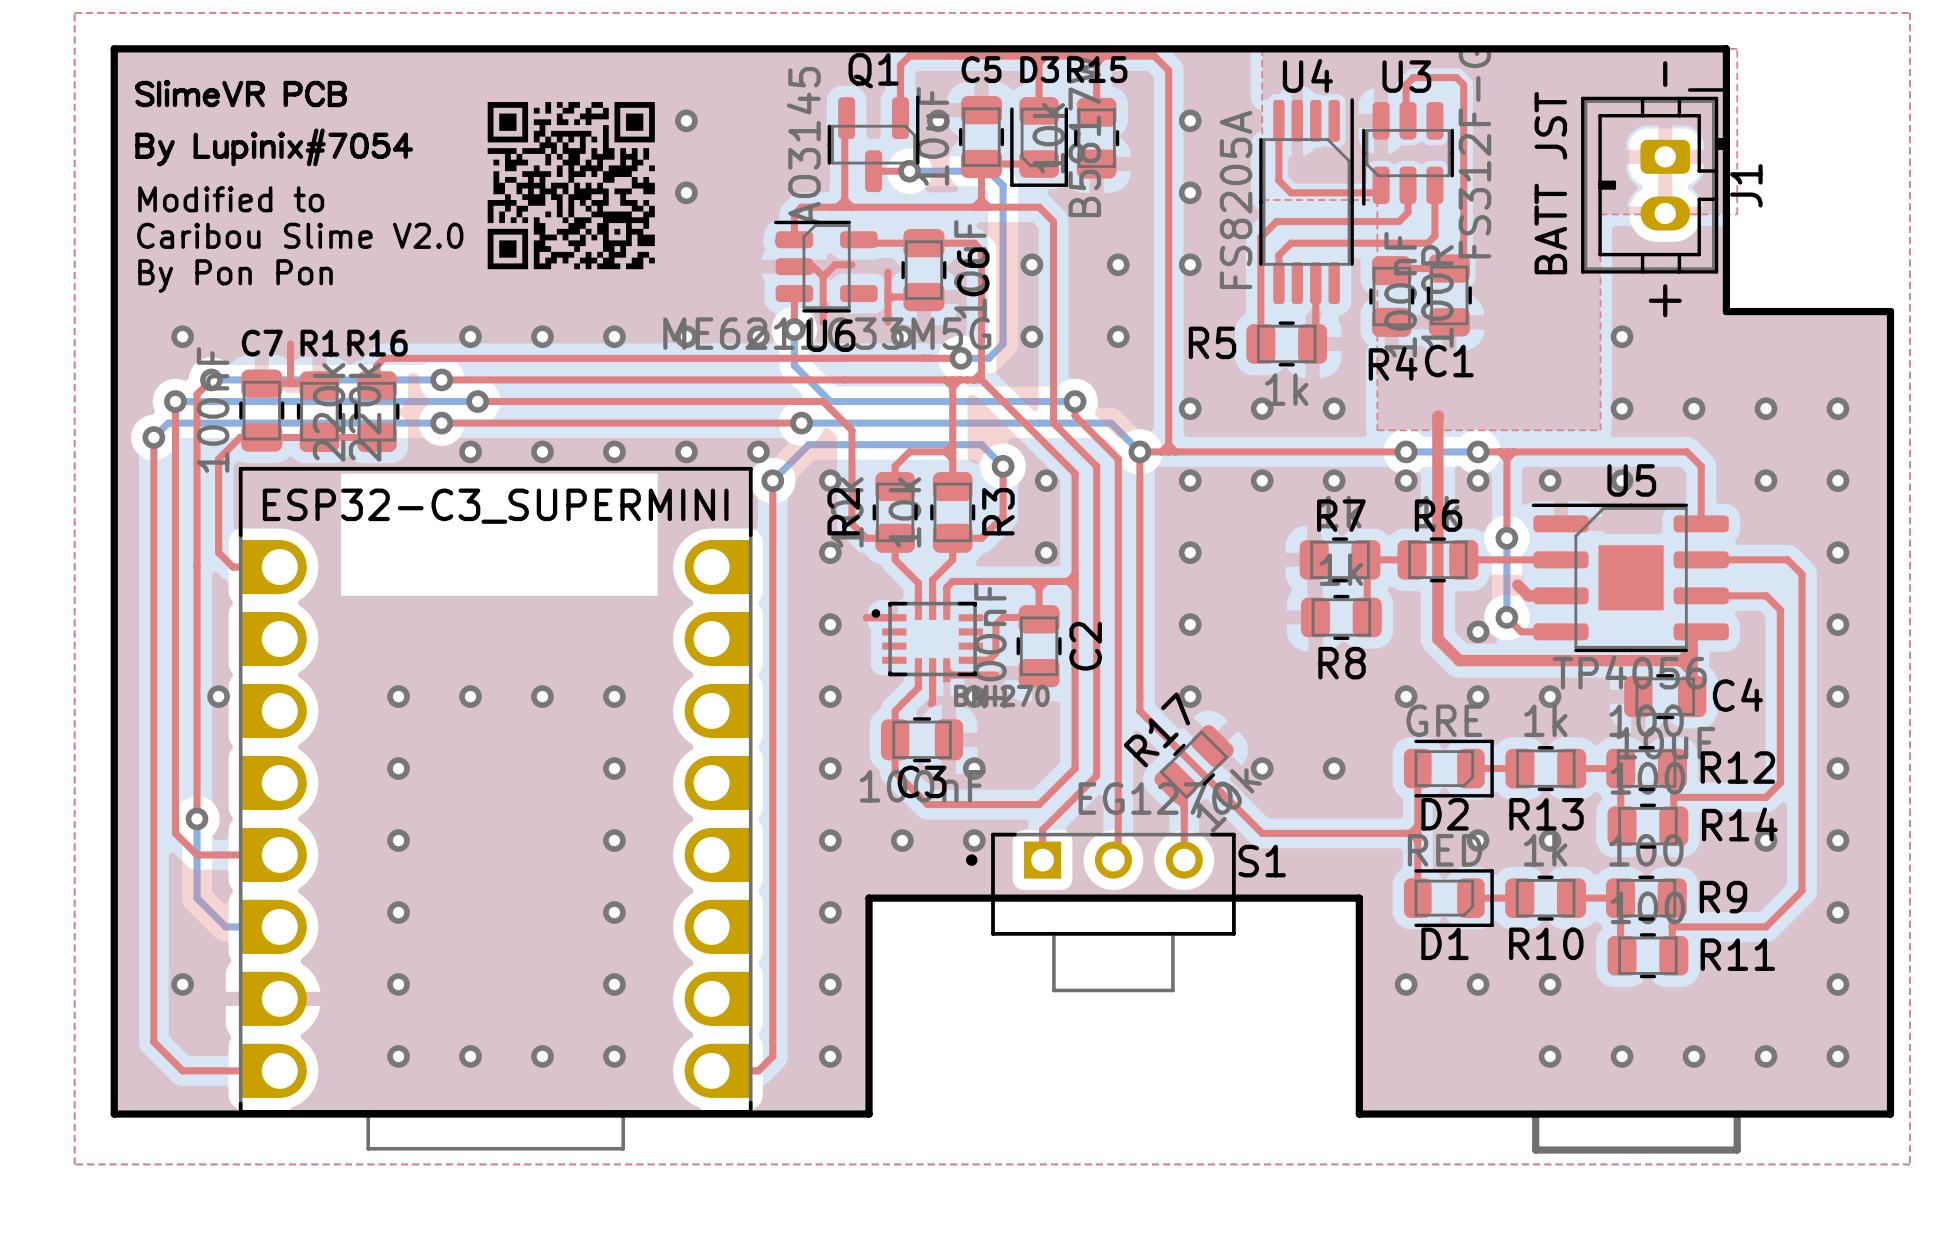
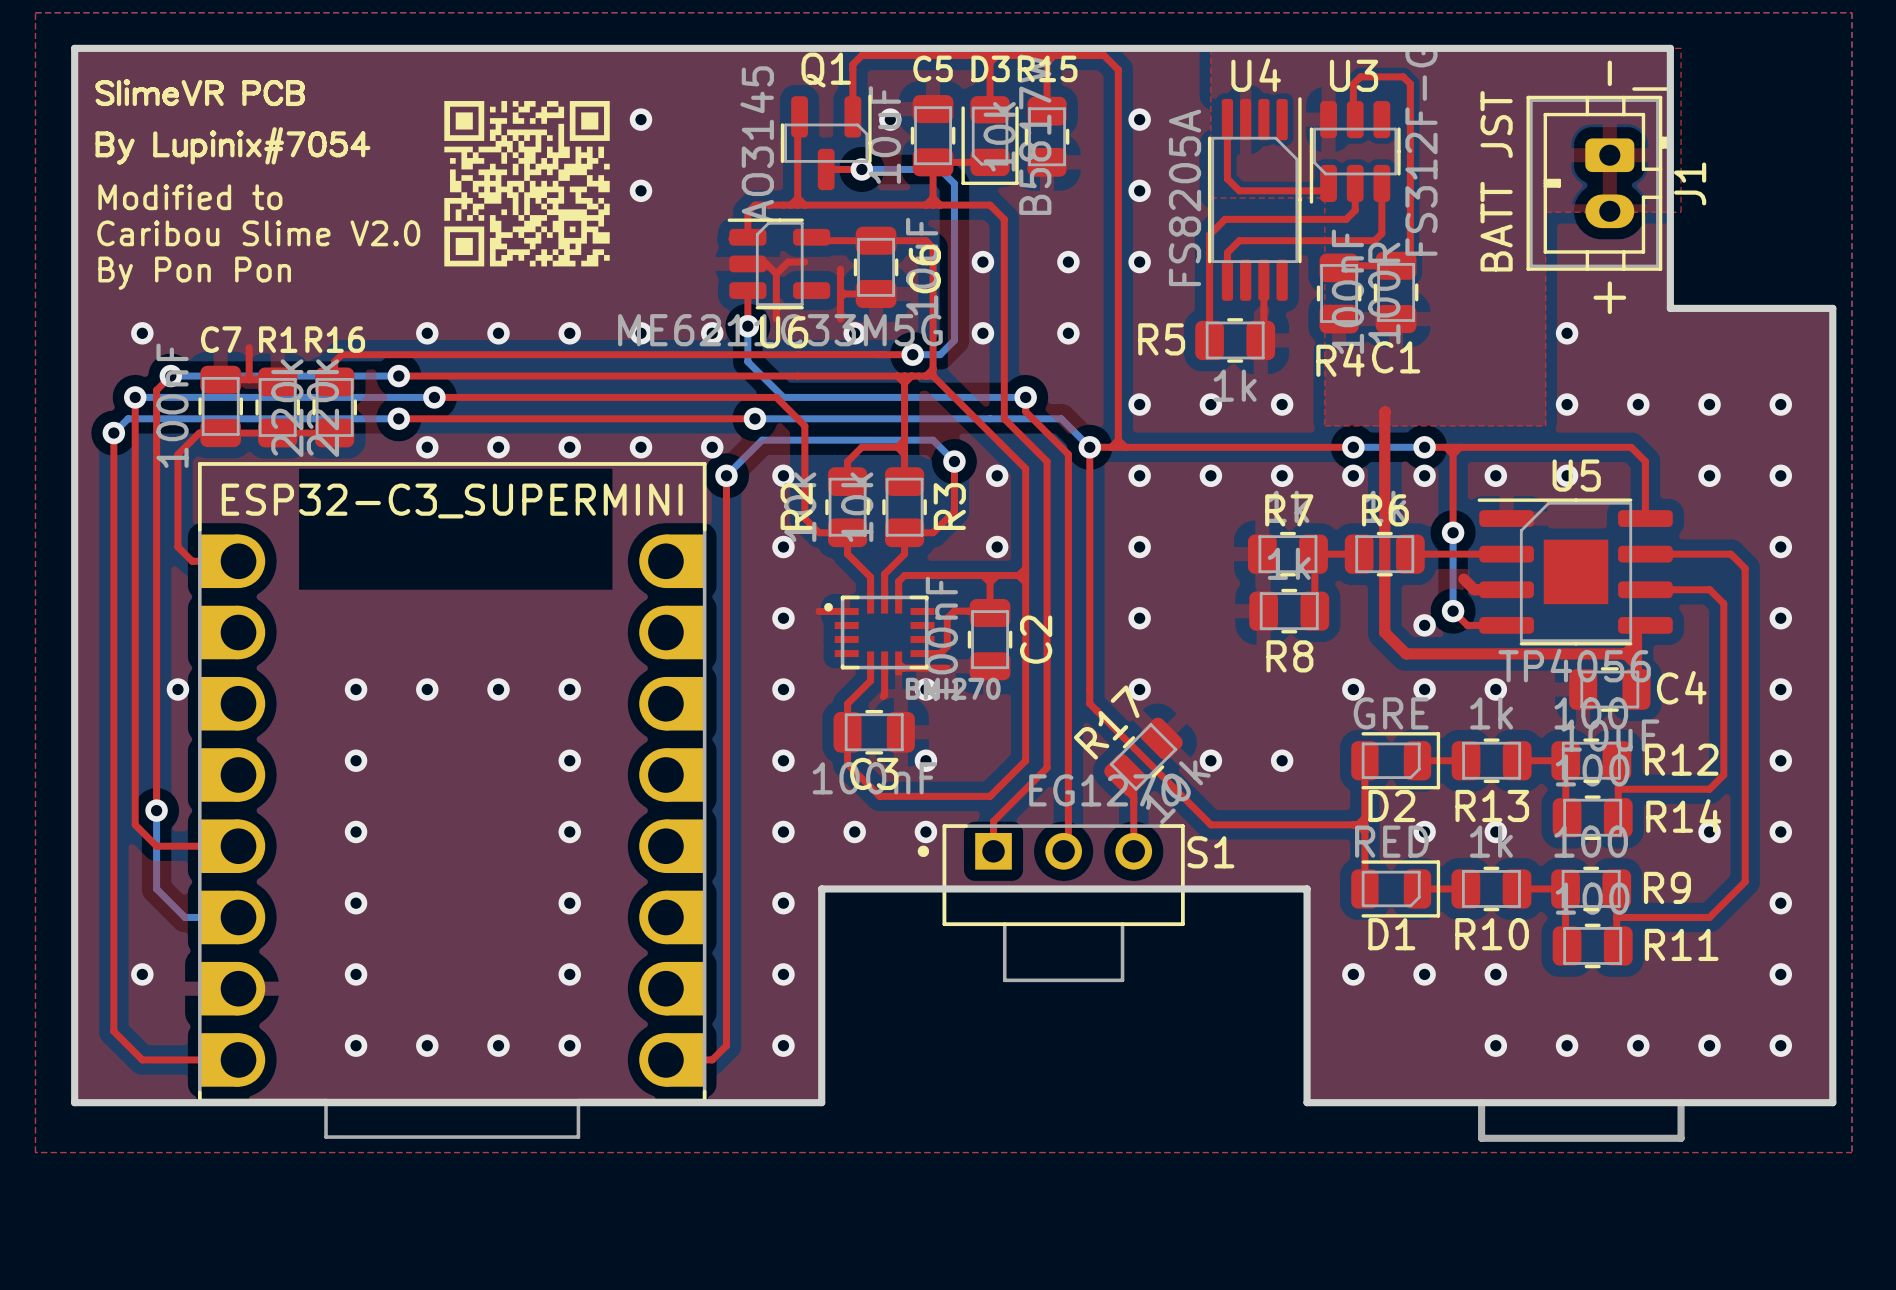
top track: (290, 343) (290, 351) -> none

